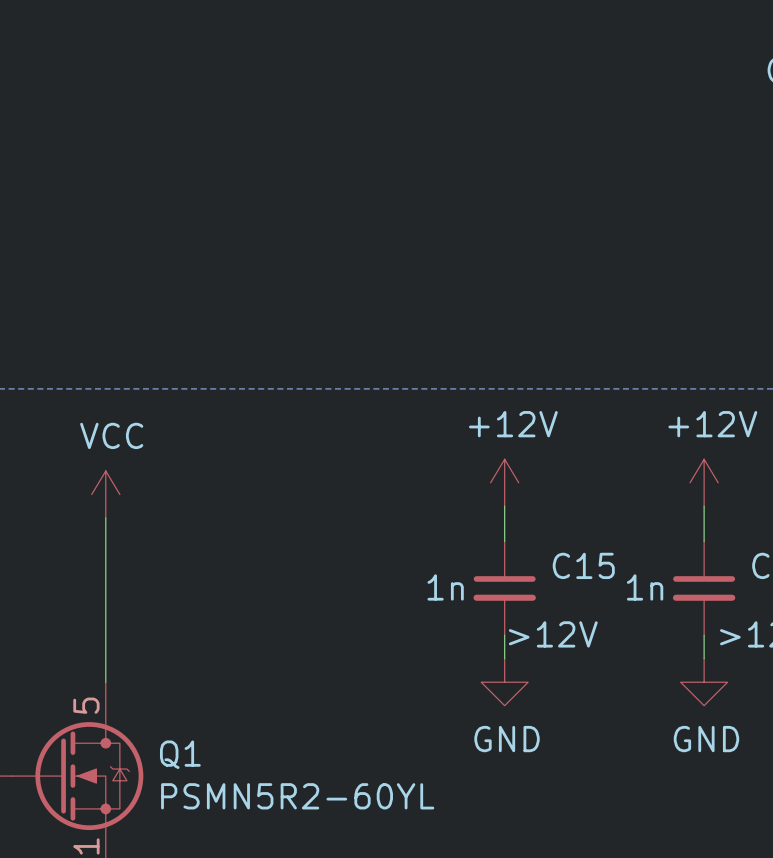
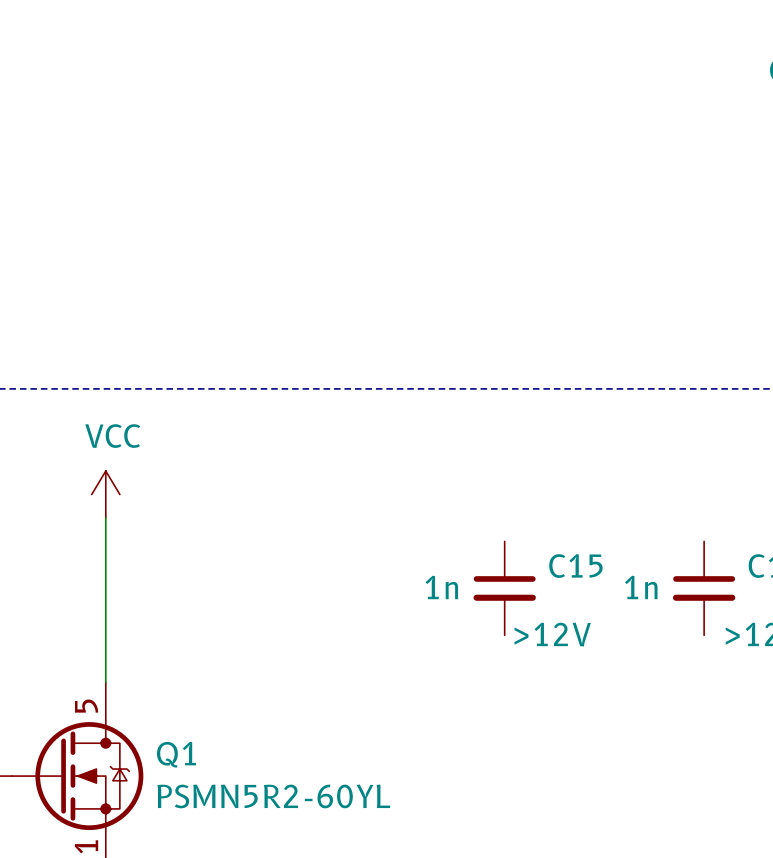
power symbol: +12V (504, 482) -> none
power symbol: +12V (704, 482) -> none
wire: (504, 506) (504, 541) -> none
wire: (704, 506) (704, 541) -> none
wire: (504, 635) (504, 658) -> none
wire: (704, 635) (704, 658) -> none
power symbol: GND (504, 682) -> none
power symbol: GND (704, 682) -> none

